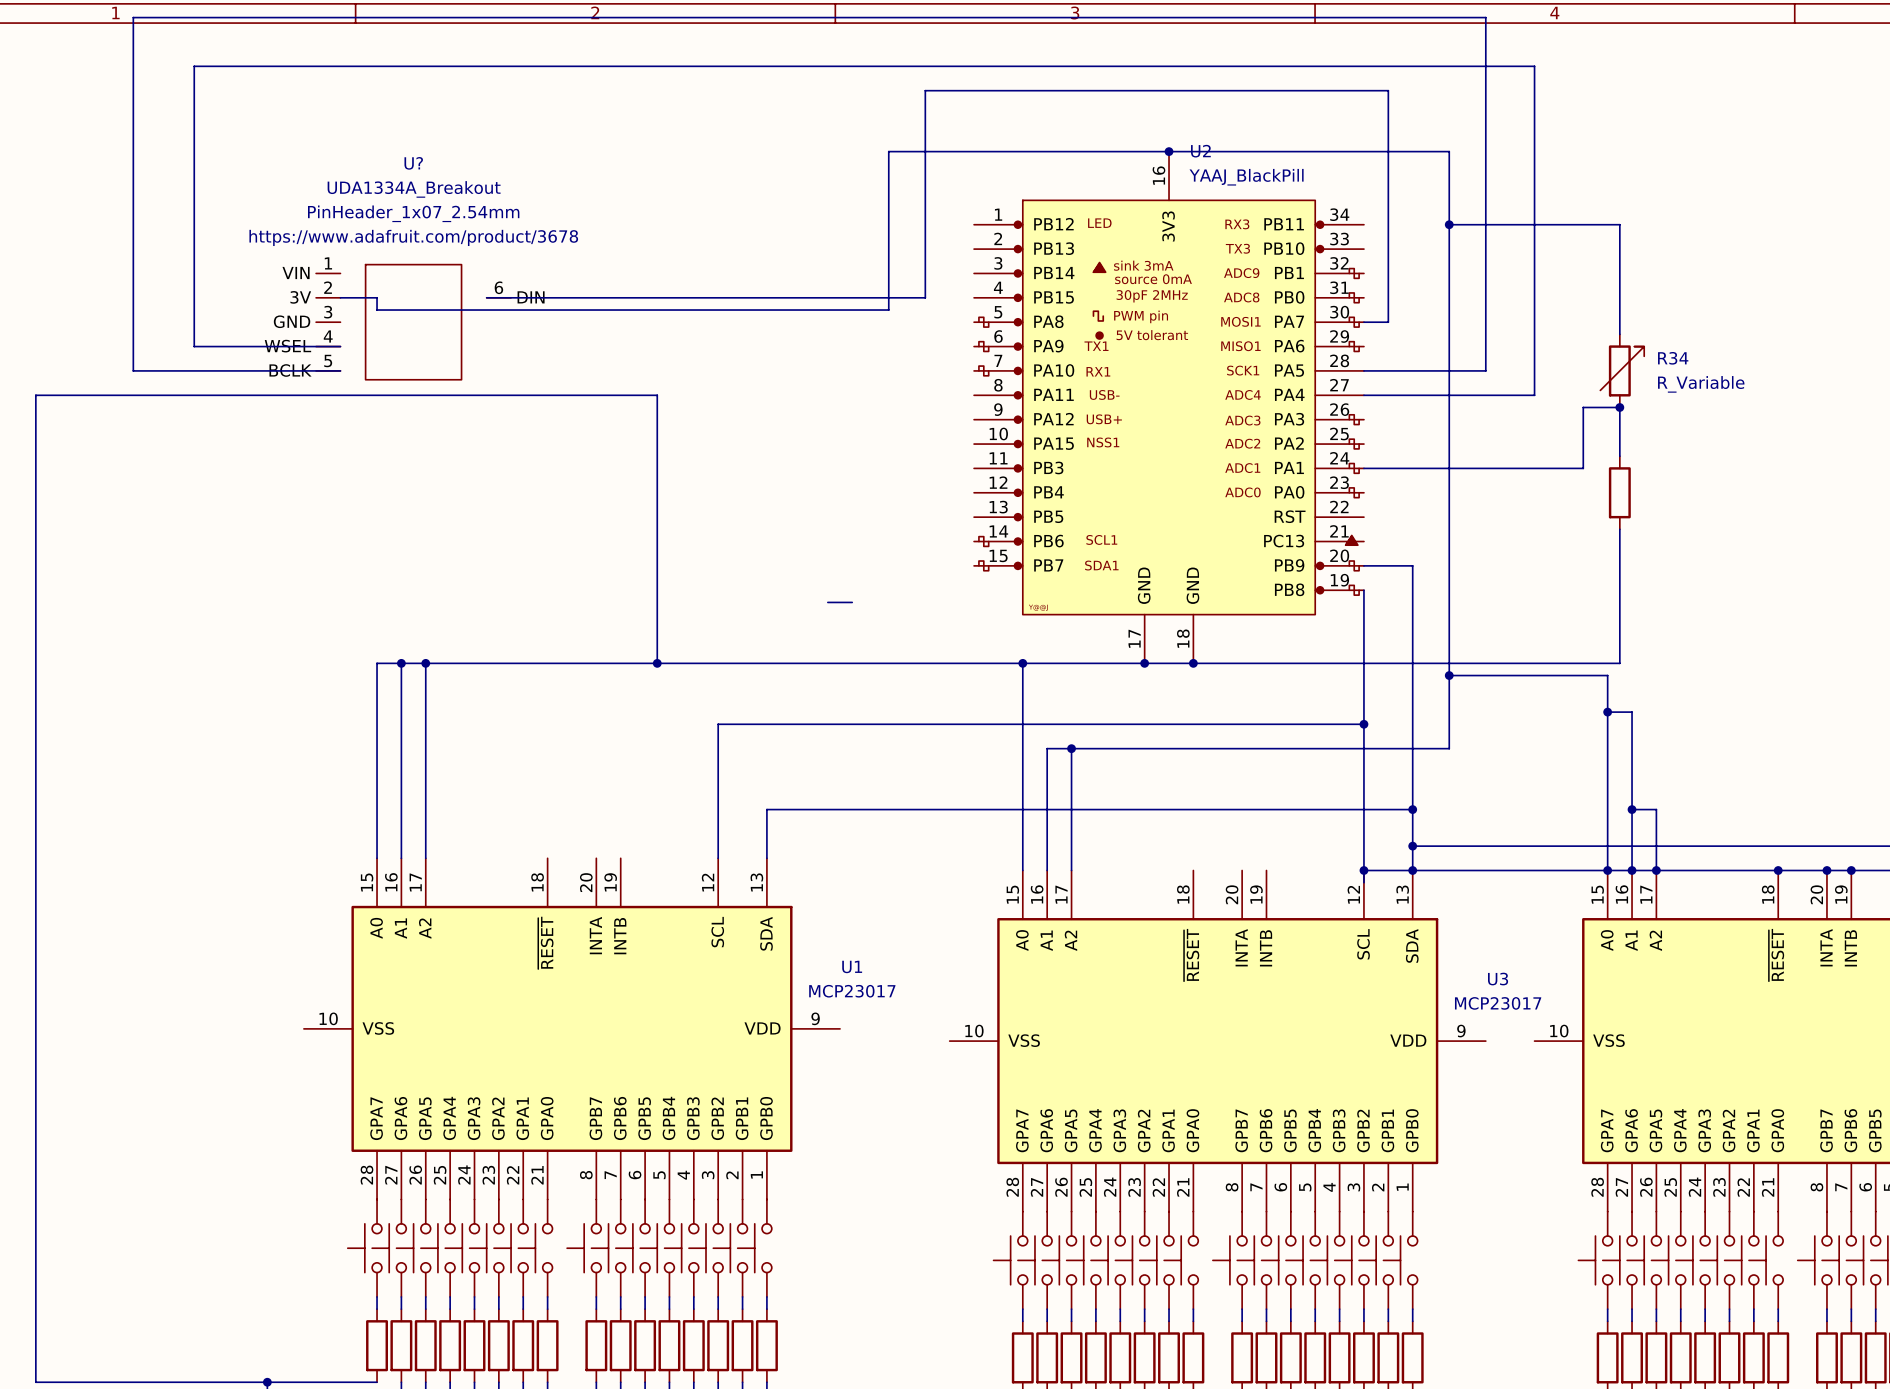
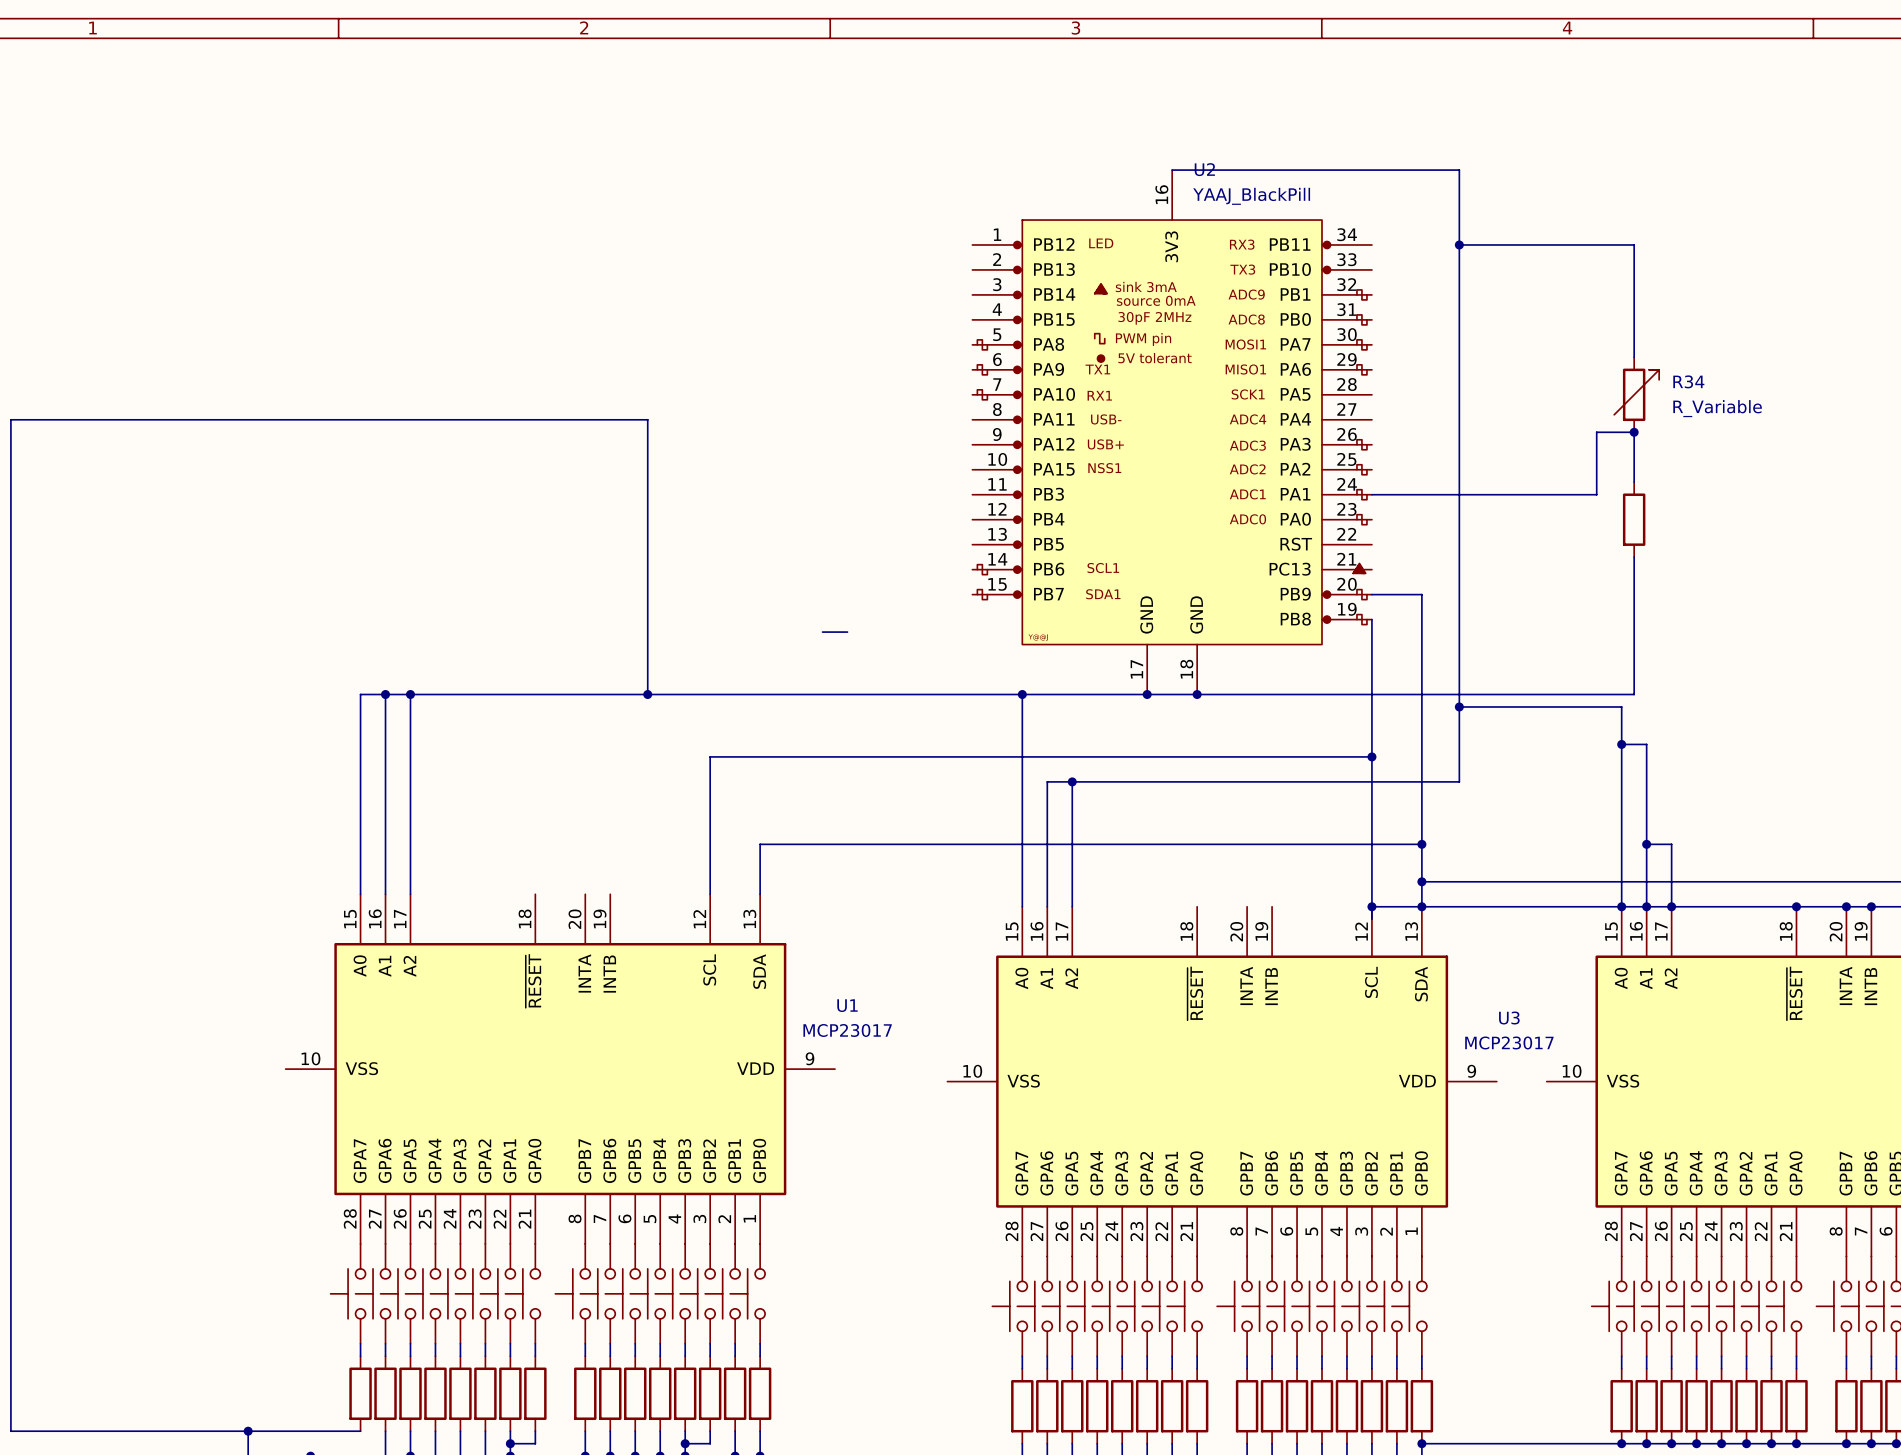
wire: (1169, 151) (888, 151) (888, 310) (377, 310) (377, 297) (340, 297) -> none
junction: (1169, 151) -> none
wire: (486, 297) (925, 297) (925, 90) (1388, 90) (1388, 322) (1363, 322) -> none
U?: UDA1334A_Breakout (413, 322) -> none
wire: (340, 346) (194, 346) (194, 66) (1534, 66) (1534, 395) (1363, 395) -> none
wire: (340, 370) (133, 370) (133, 17) (1485, 17) (1485, 370) (1363, 370) -> none

